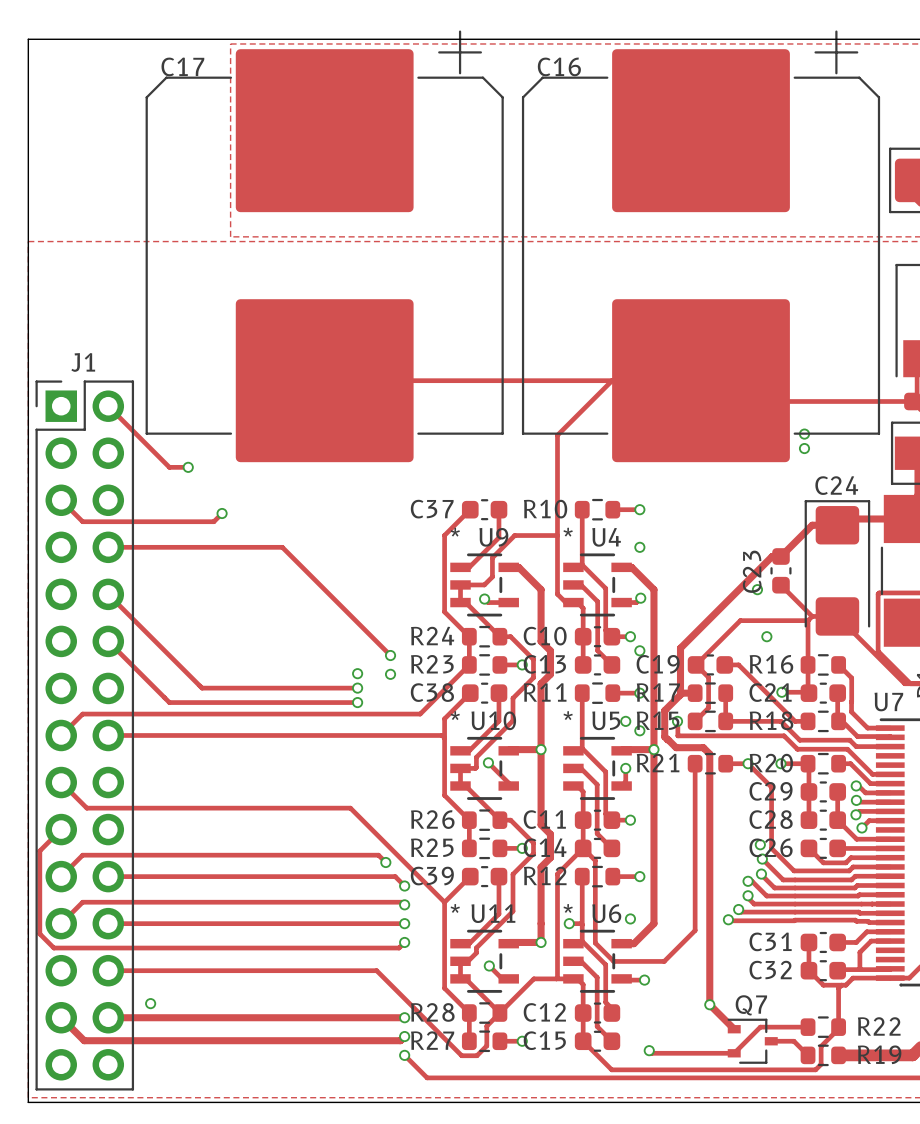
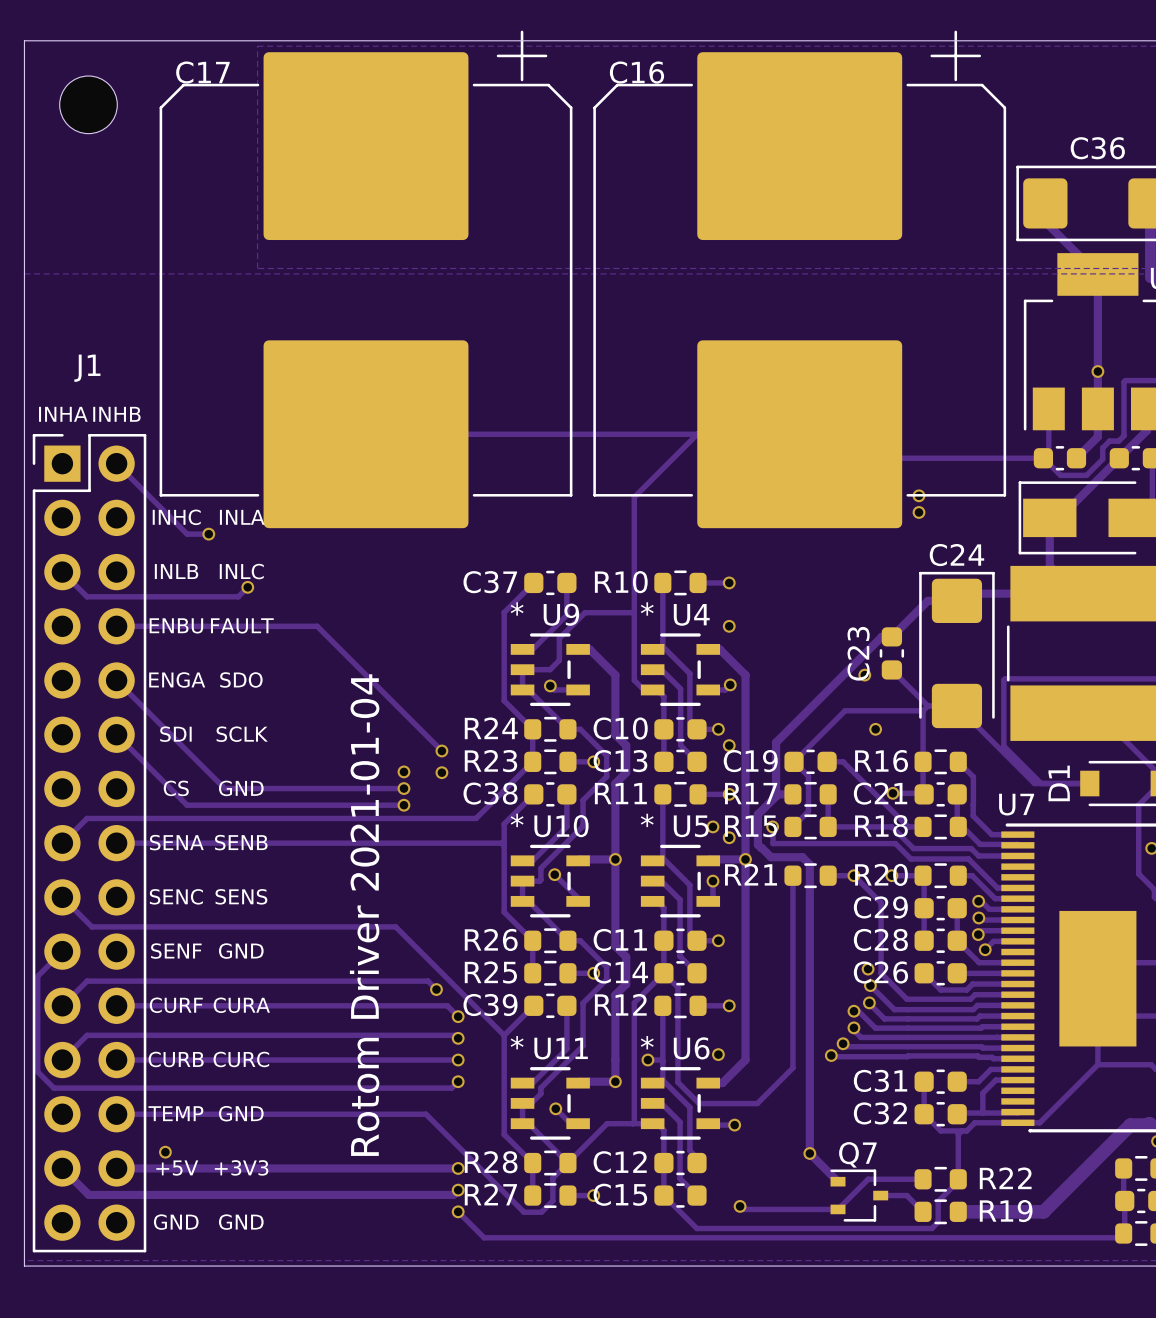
part: none -> (88, 104)
J1 name position: J1 (83, 362) -> J1 (87, 368)
text: none -> INHA (63, 414)
text: none -> INHB (116, 414)
text: none -> INHC (176, 517)
text: none -> INLA (242, 517)
text: none -> INLB (176, 571)
text: none -> INLC (241, 571)
text: none -> ENBU (176, 625)
text: none -> FAULT (242, 625)
text: none -> ENGA (177, 679)
text: none -> SDO (241, 679)
text: none -> SDI (175, 734)
text: none -> SCLK (242, 734)
text: none -> CS (176, 788)
text: none -> GND (241, 788)
text: none -> SENA (176, 842)
text: none -> SENB (241, 842)
text: none -> SENC (176, 896)
text: none -> SENS (241, 896)
text: none -> Rotom Driver 2021-01-04 (364, 915)
text: none -> SENF (176, 951)
text: none -> GND (241, 951)
text: none -> CURF (176, 1005)
text: none -> CURA (241, 1005)
text: none -> CURB (176, 1059)
text: none -> CURC (241, 1059)
text: none -> TEMP (175, 1113)
text: none -> GND (241, 1113)
text: none -> +5V (177, 1168)
text: none -> +3V3 (241, 1167)
text: none -> GND (176, 1222)
text: none -> GND (241, 1222)

